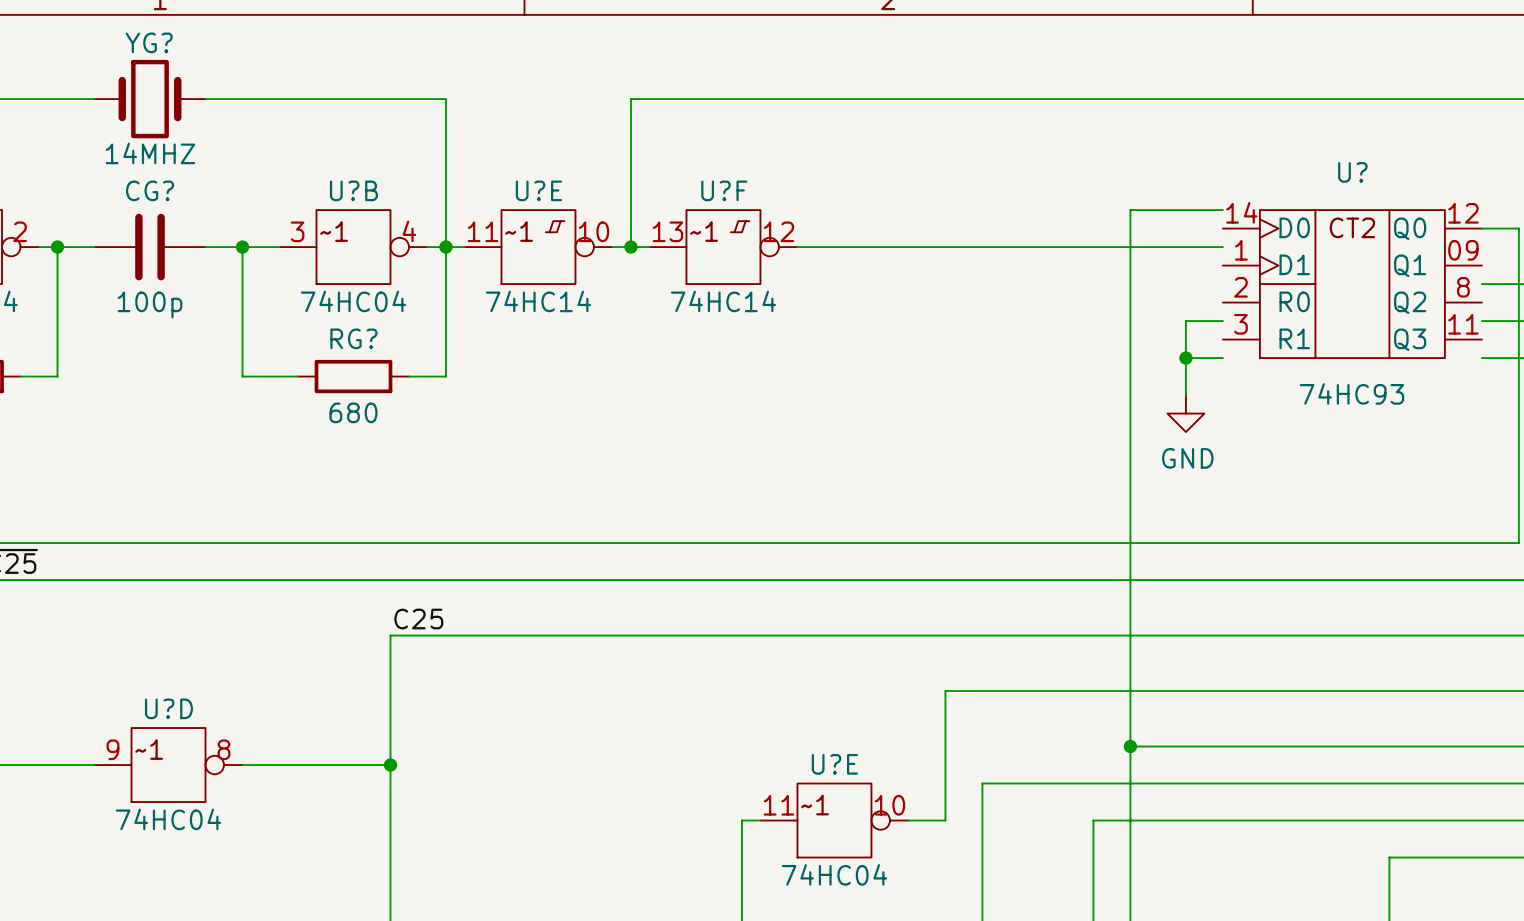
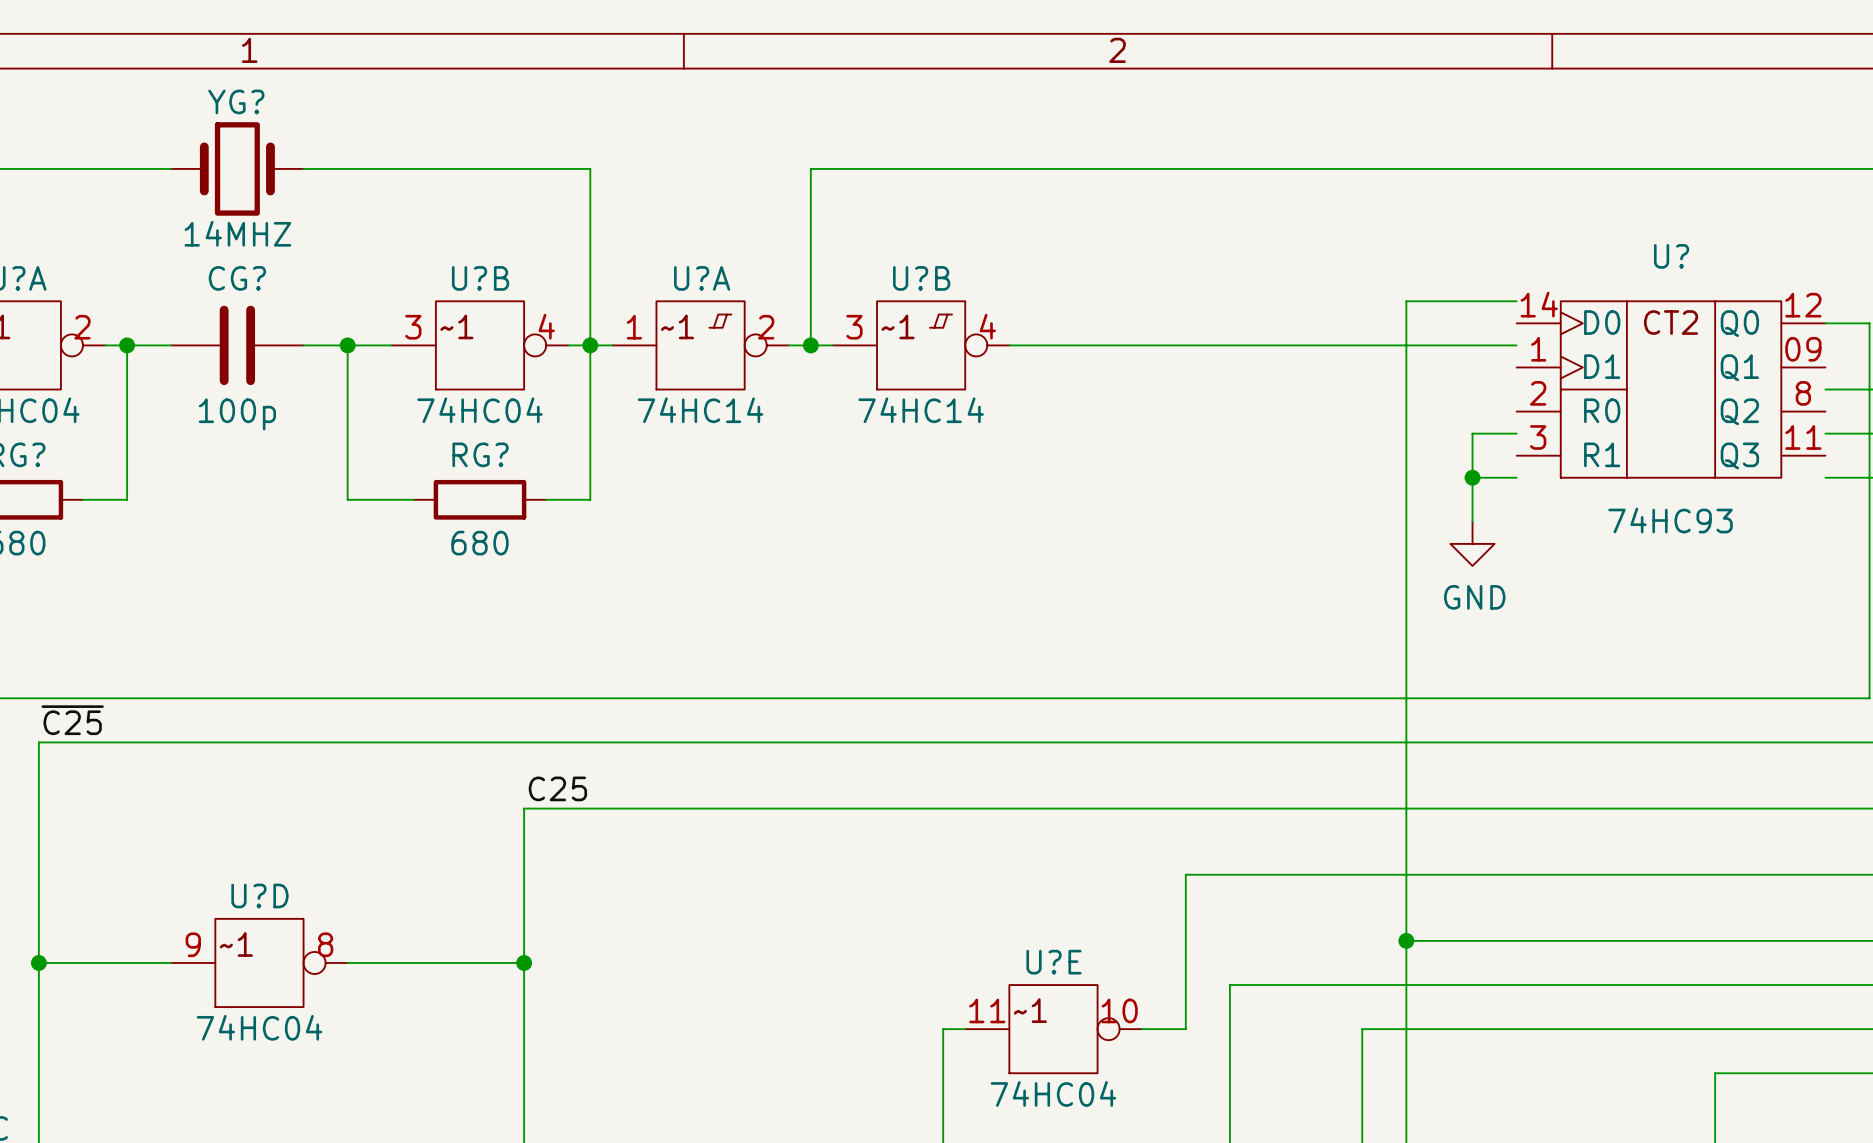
U?E name: U?E (538, 190) -> U?A (702, 278)
U?F name: U?F (724, 190) -> U?B (921, 278)
U?E pin number: 11 (482, 231) -> 1 (634, 327)
U?E pin number: 10 (593, 231) -> 2 (766, 327)
U?F pin number: 13 (667, 231) -> 3 (854, 327)
U?F pin number: 12 (778, 231) -> 4 (987, 326)

